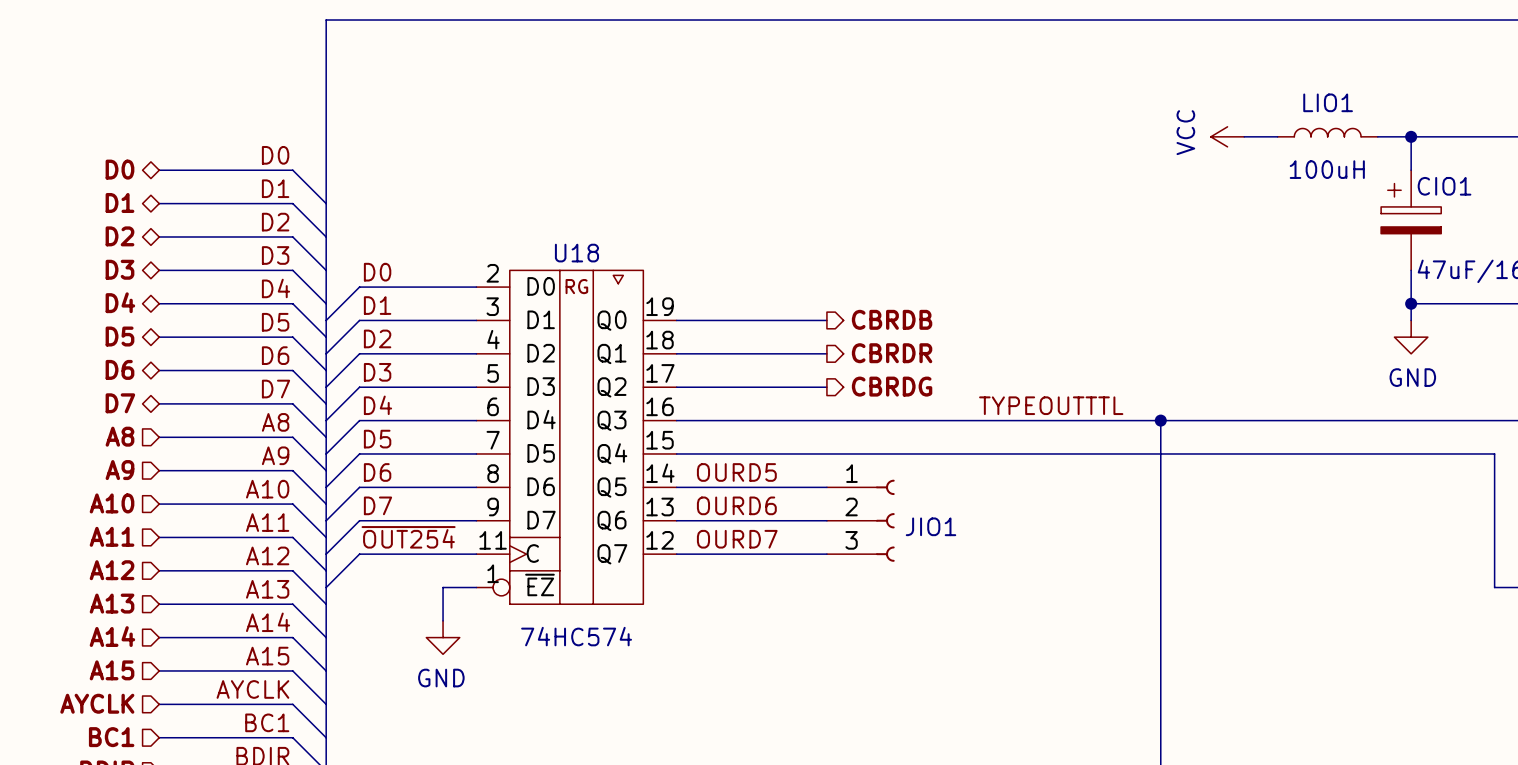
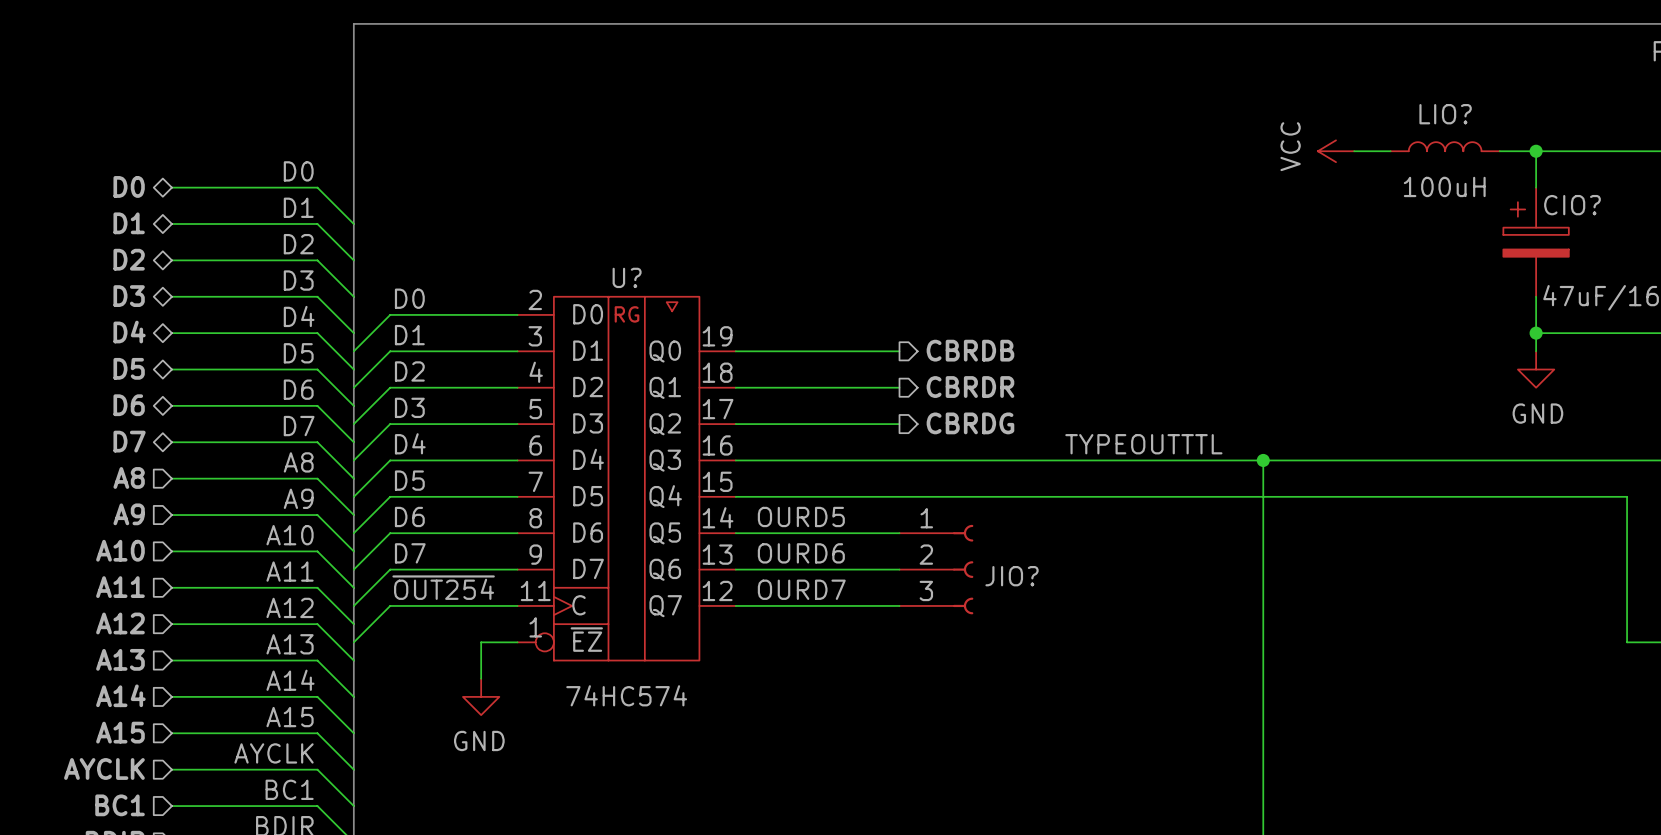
LIO1 name: LIO1 (1328, 102) -> LIO? (1445, 114)
CIO1 name: CIO1 (1444, 186) -> CIO? (1572, 205)
U18 name: U18 (576, 253) -> U? (627, 277)
JIO1 name: JIO1 (931, 526) -> JIO? (1012, 576)

